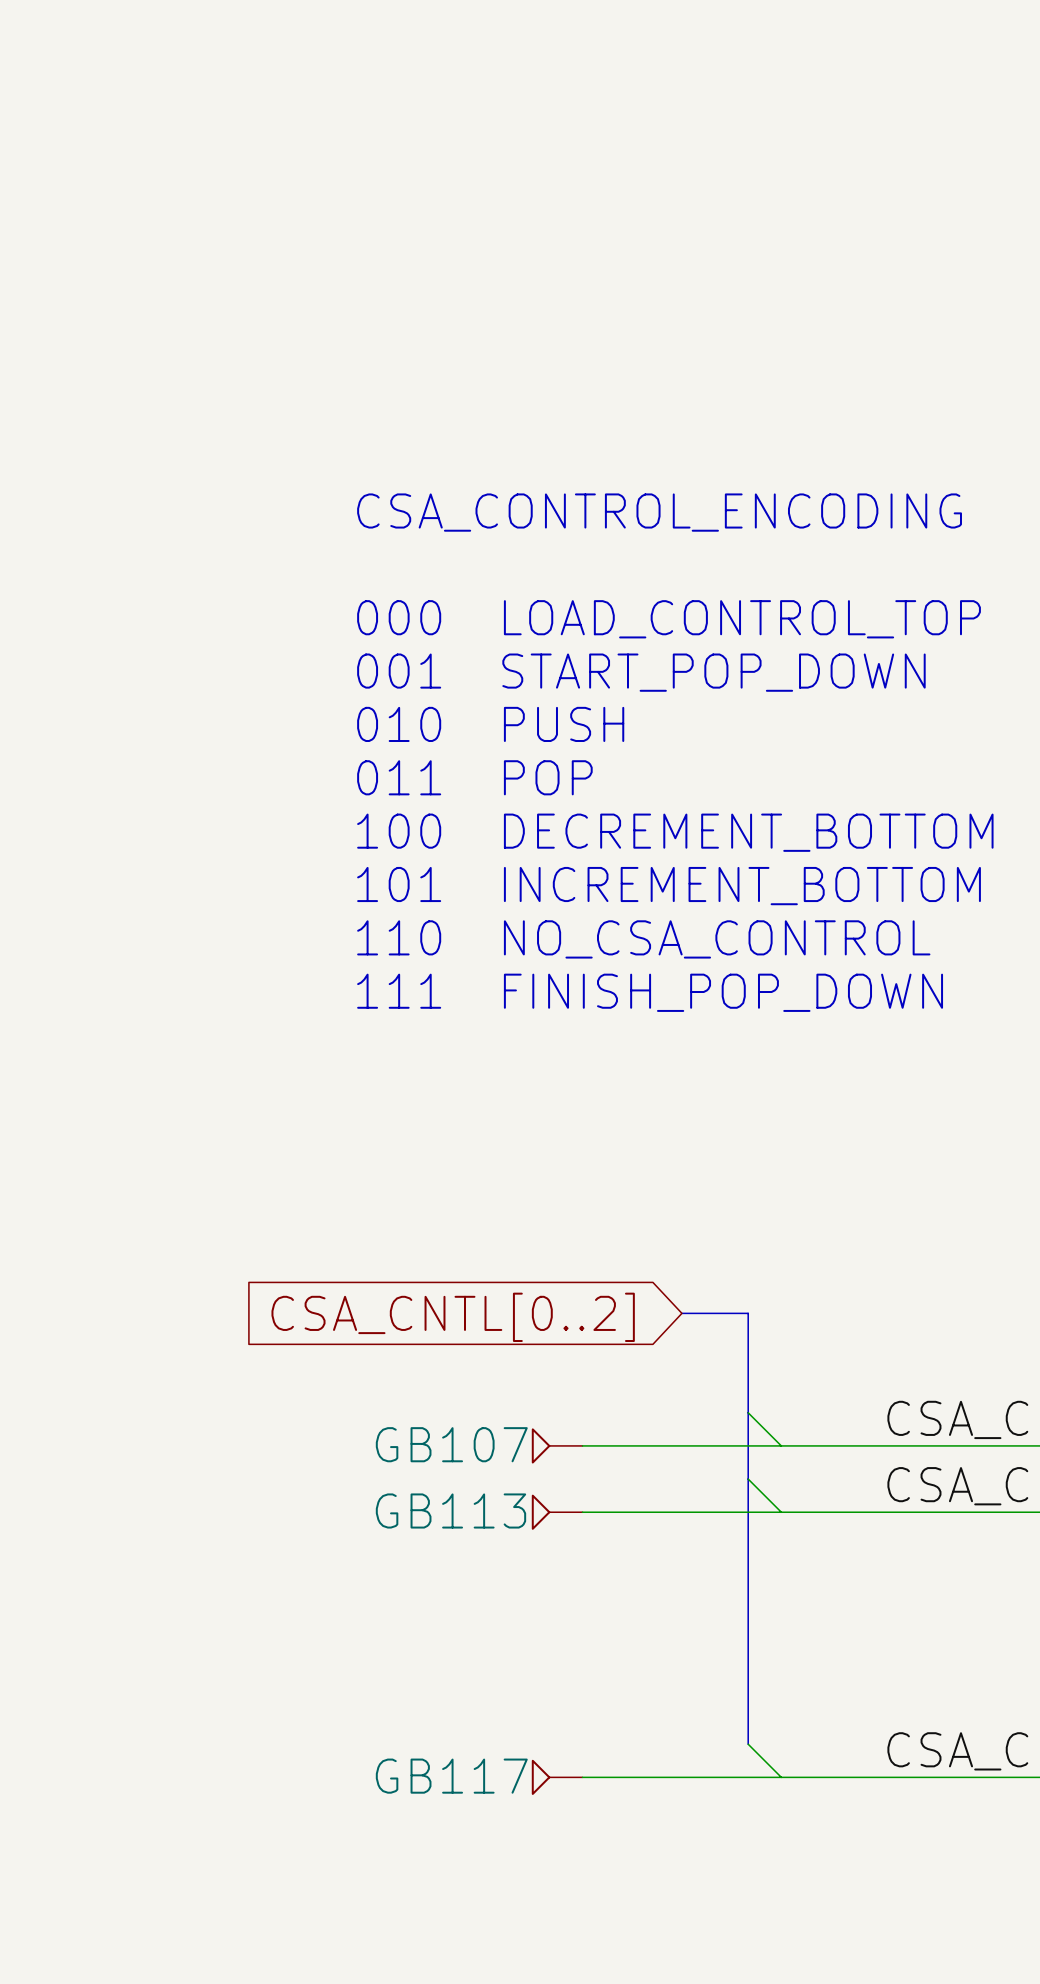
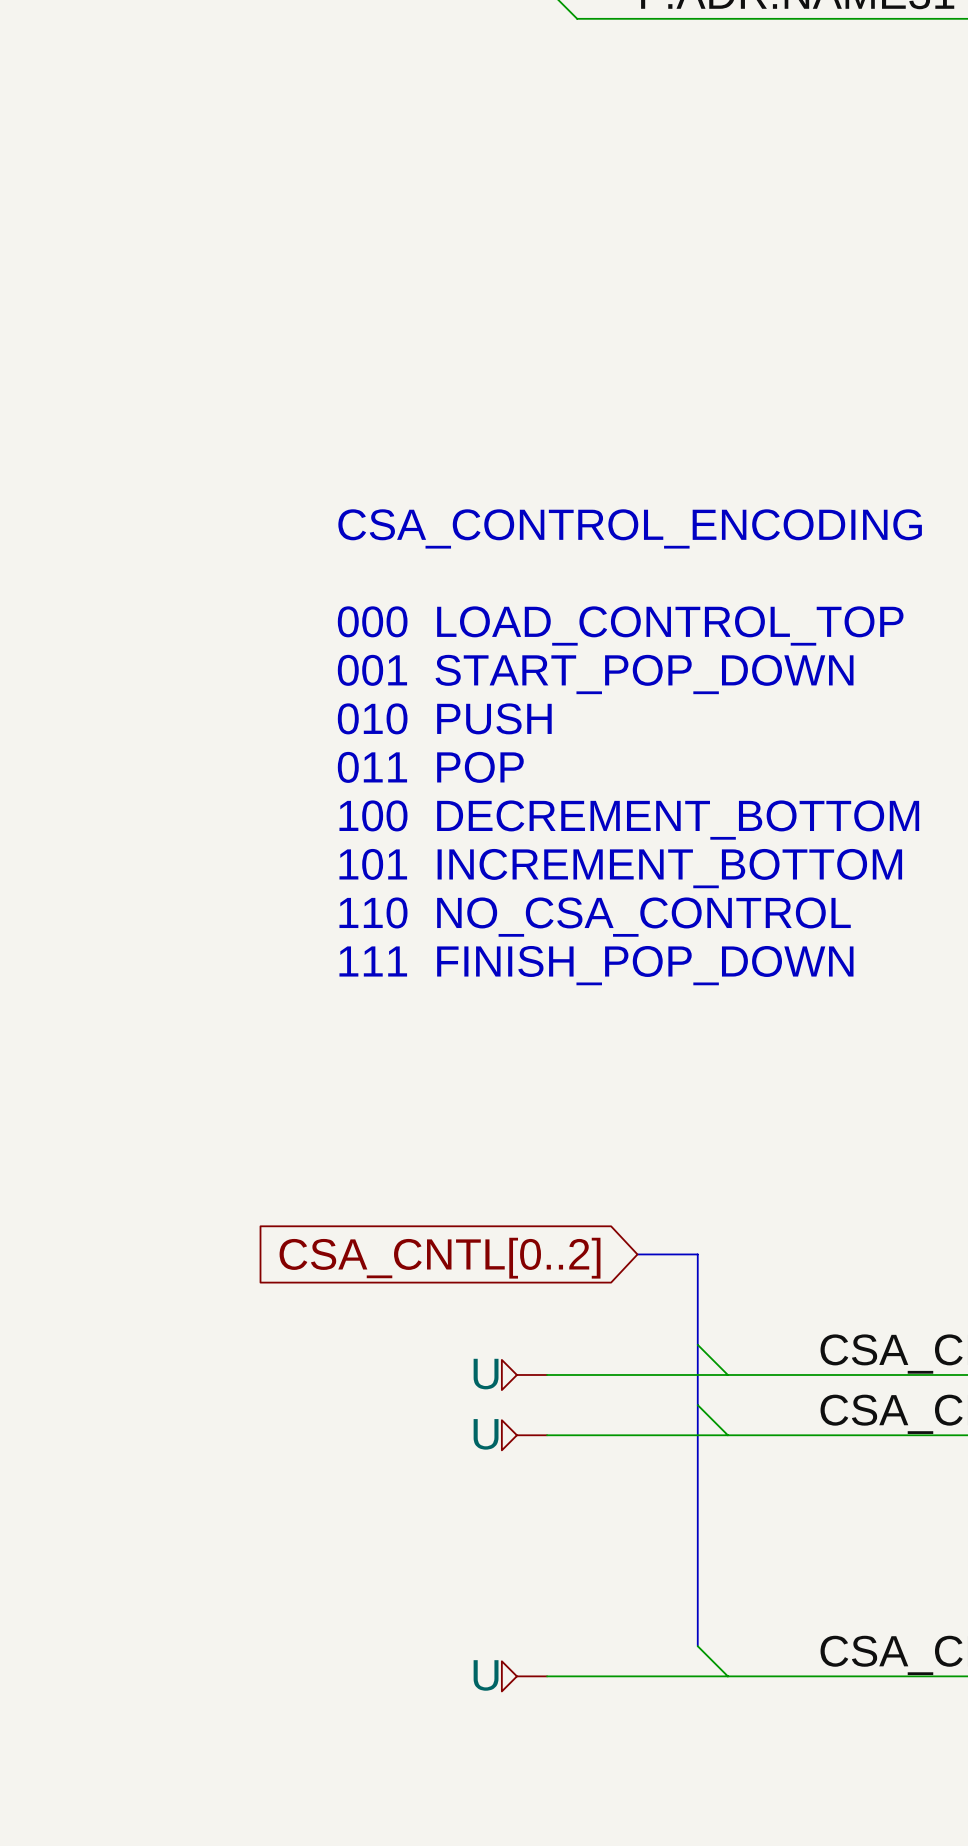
GB107 name: GB107 (451, 1444) -> U (486, 1374)
GB113 name: GB113 (450, 1510) -> U (486, 1434)
GB117 name: GB117 (451, 1776) -> U (486, 1675)

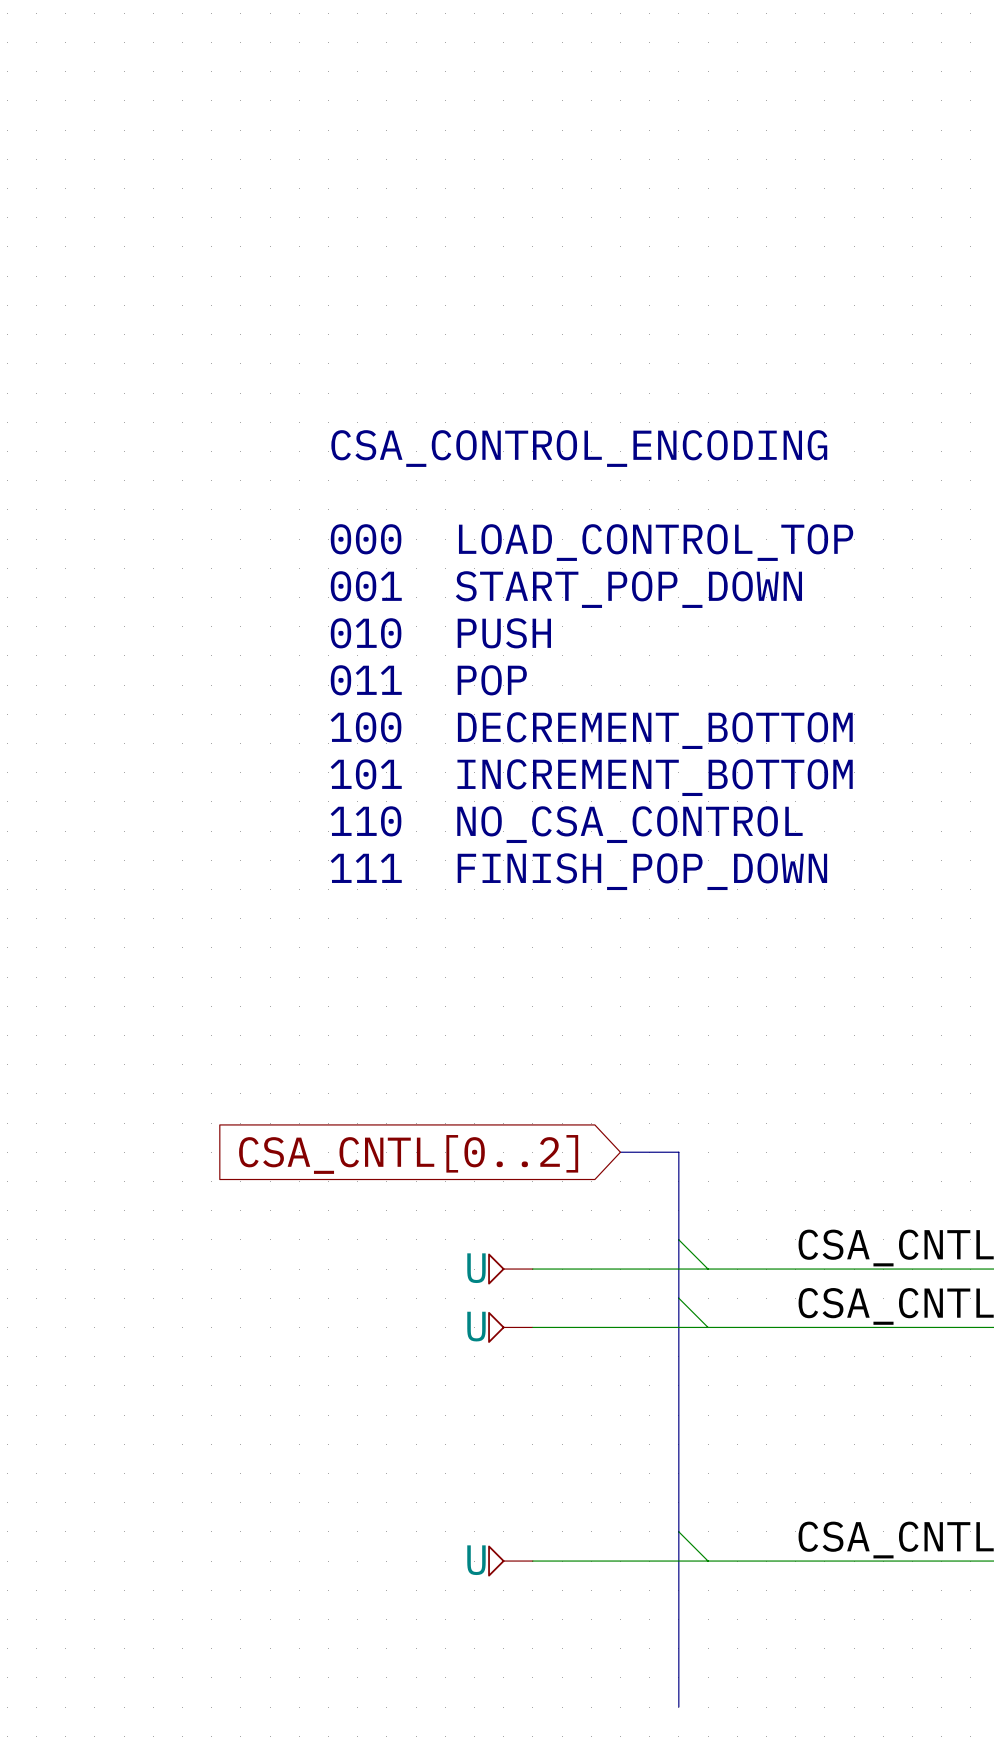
bus: none -> (678, 1531) (678, 1707)

